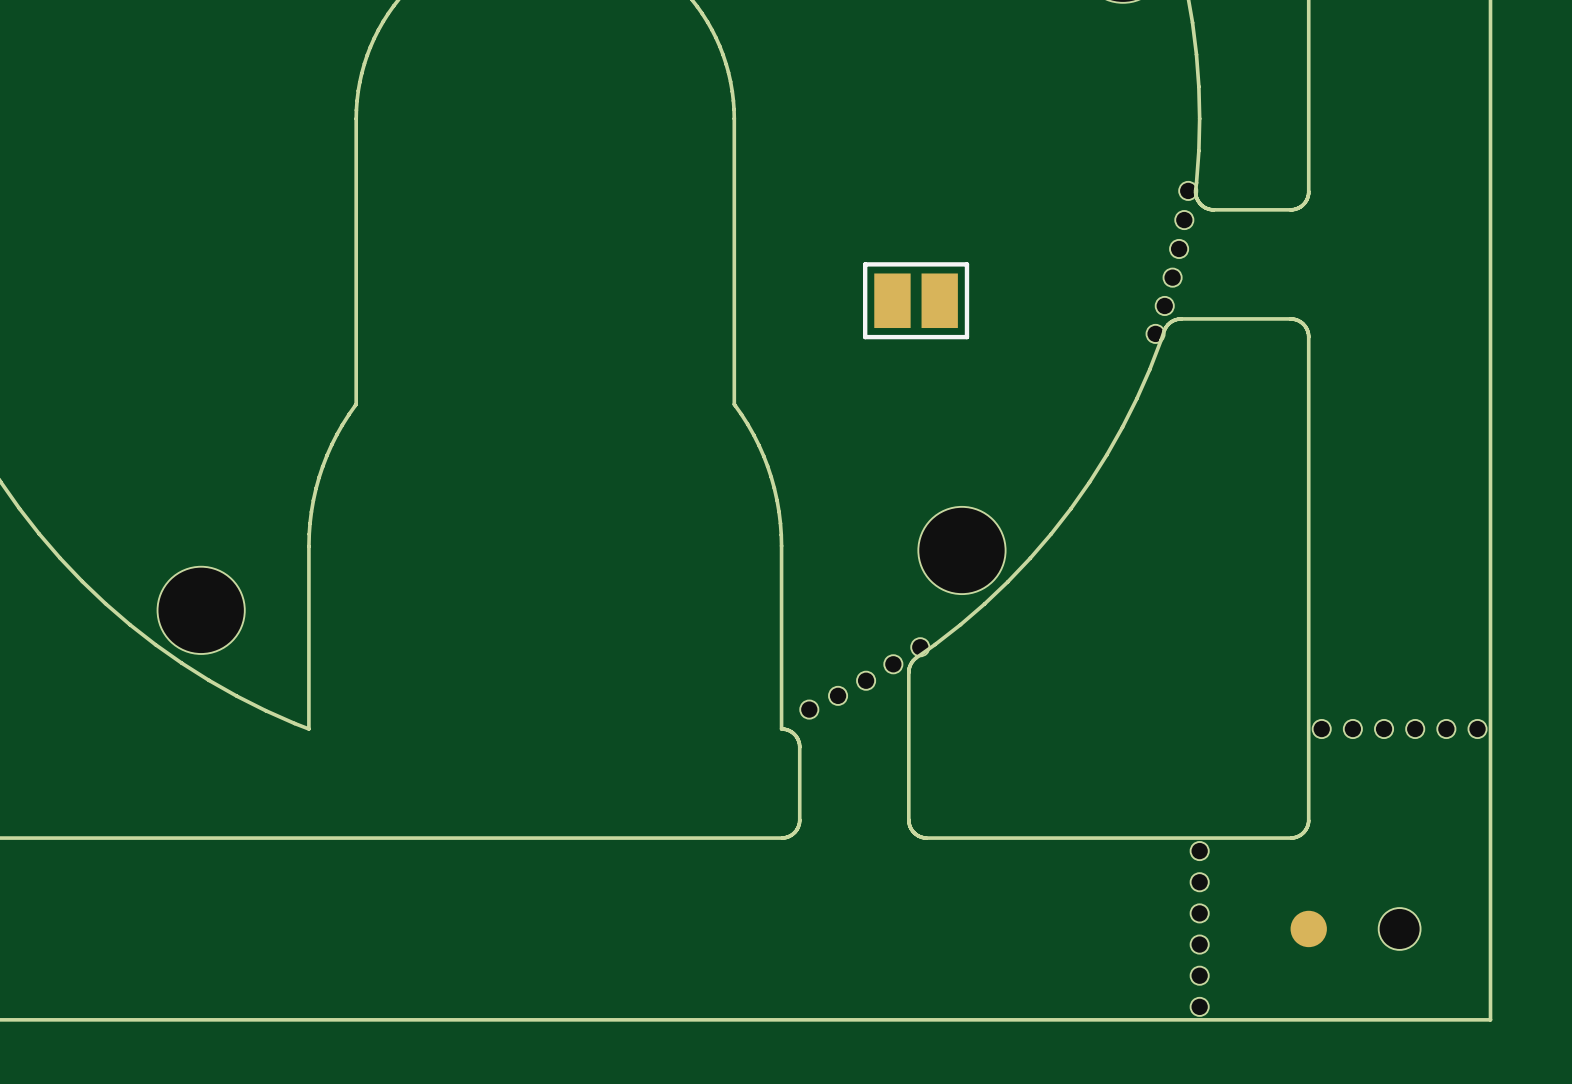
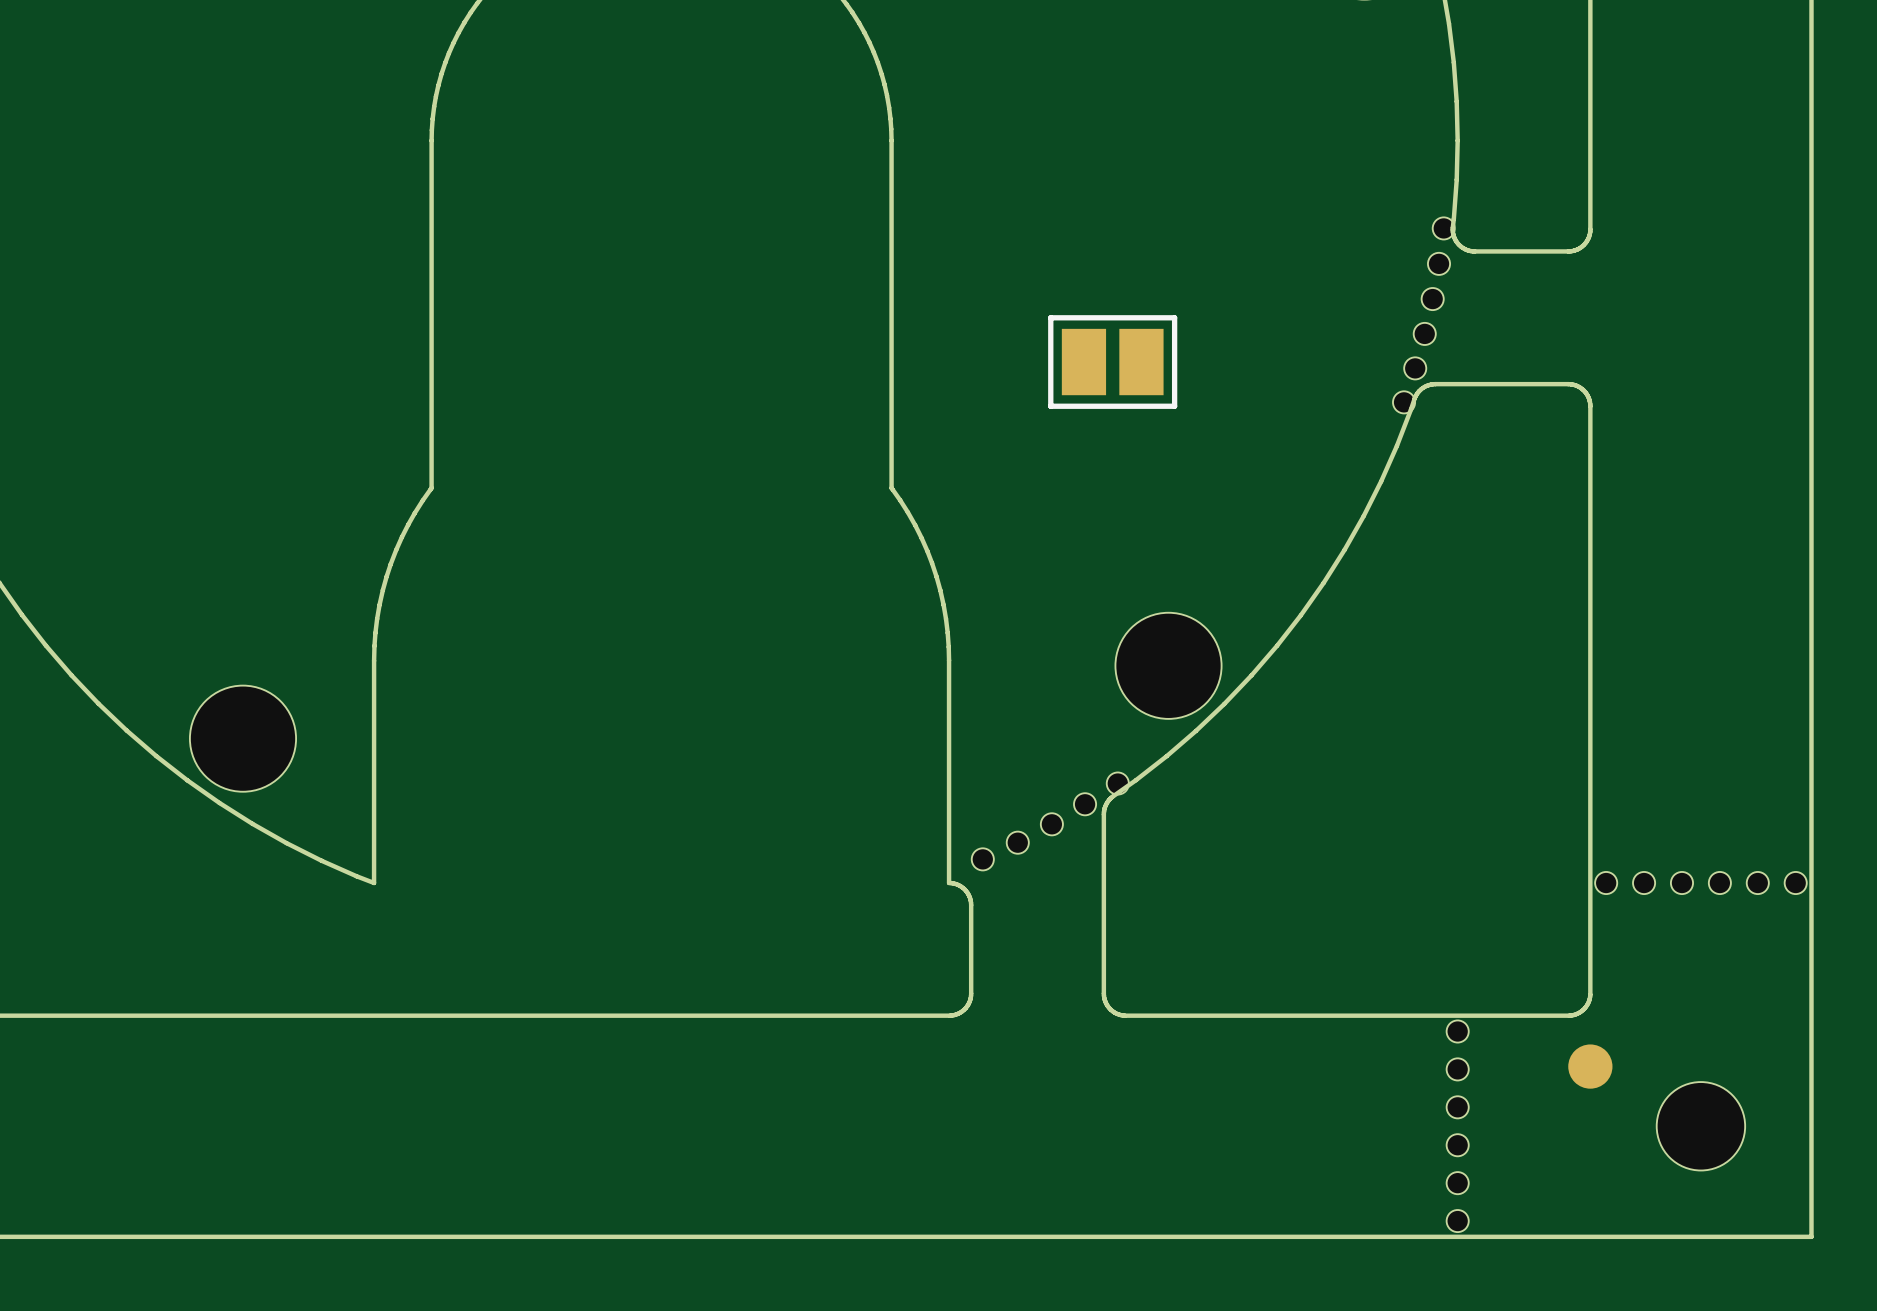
part footprint: [1378, 908, 1421, 950] -> [1656, 1082, 1746, 1171]
part position: (1308, 928) -> (1590, 1066)

